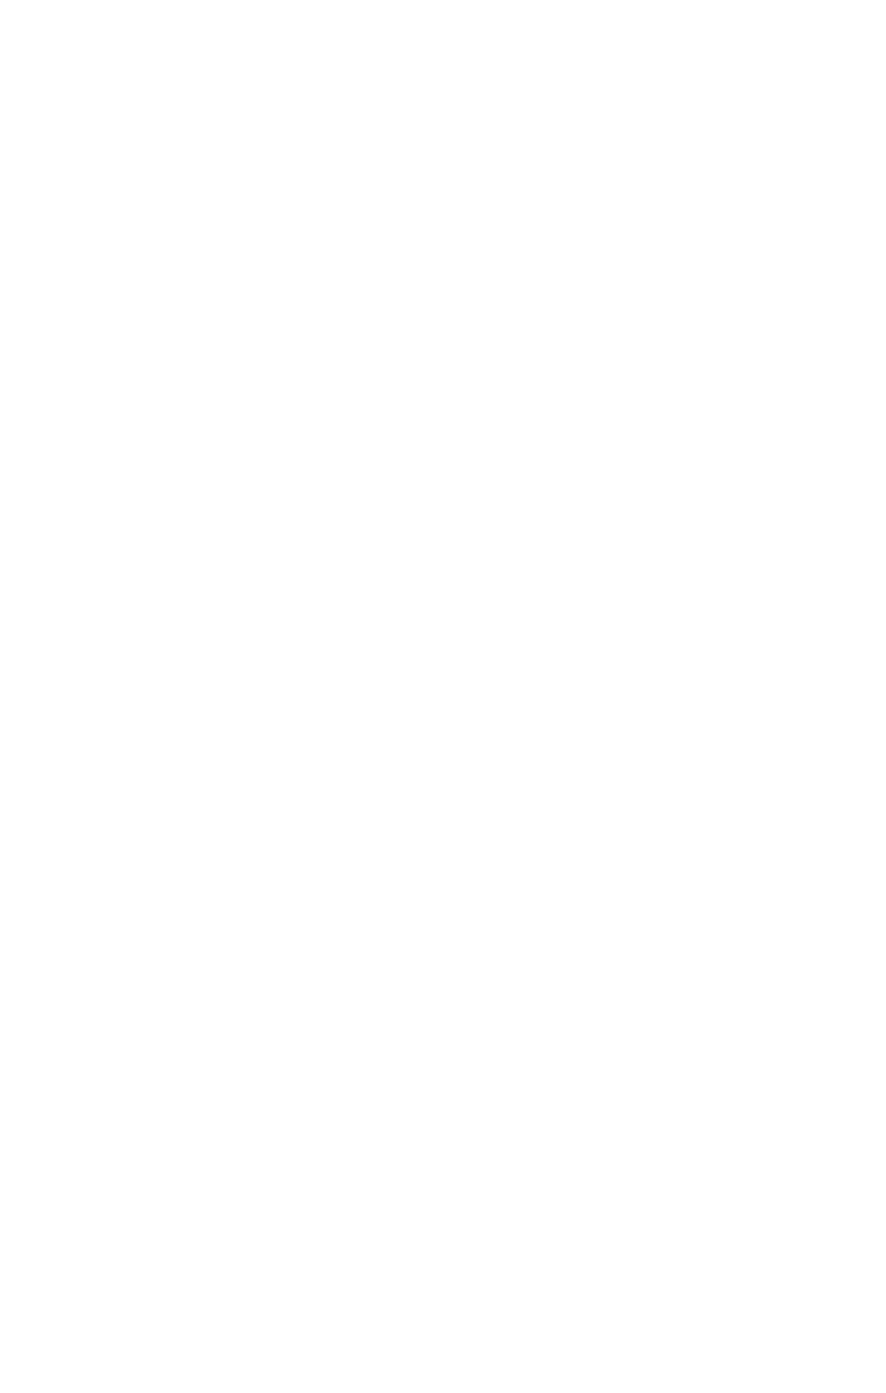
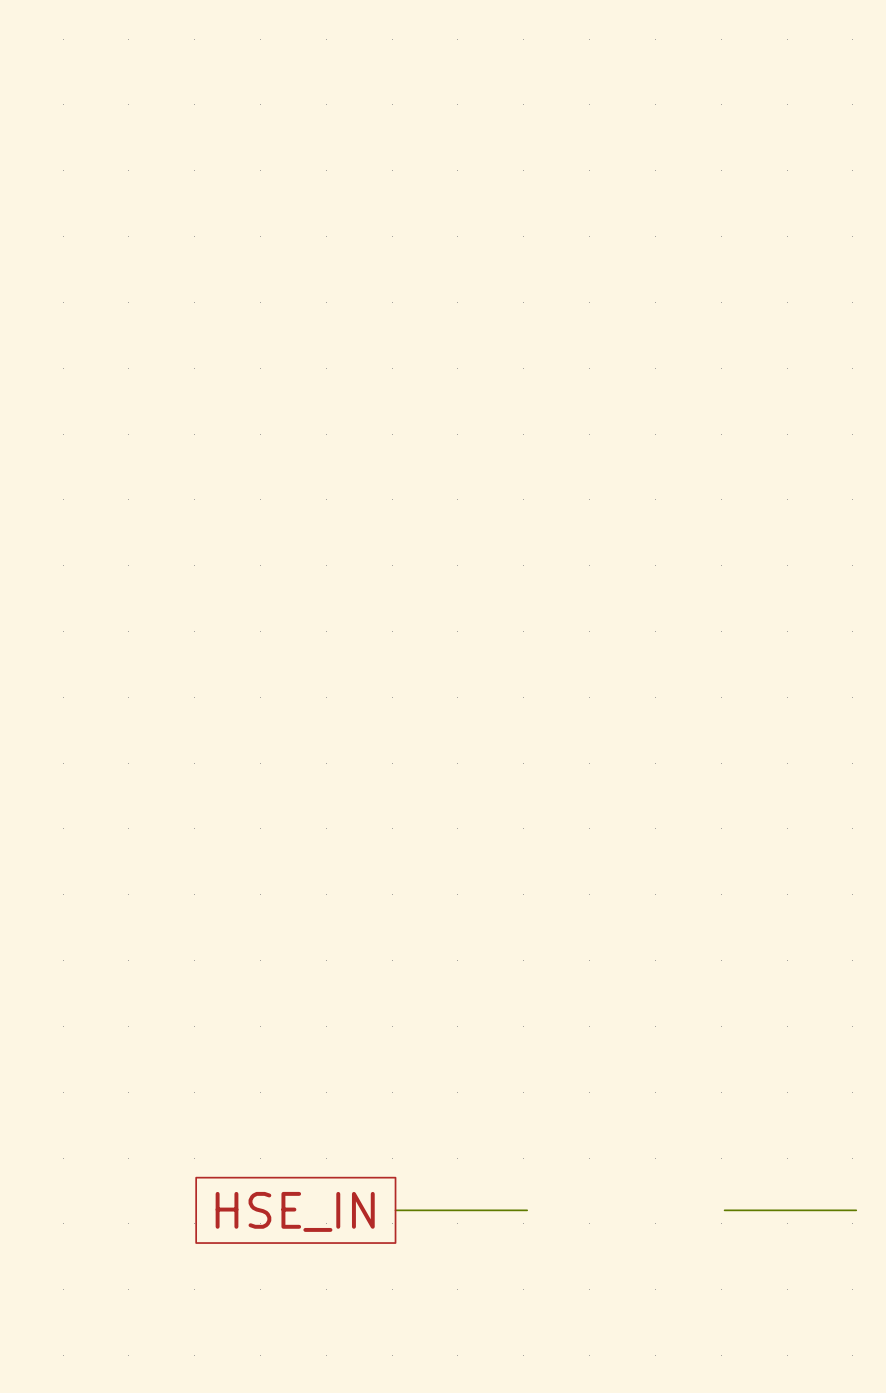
wire: none -> (395, 1210) (527, 1210)
wire: none -> (724, 1210) (856, 1210)
global label: none -> HSE_IN (295, 1211)

